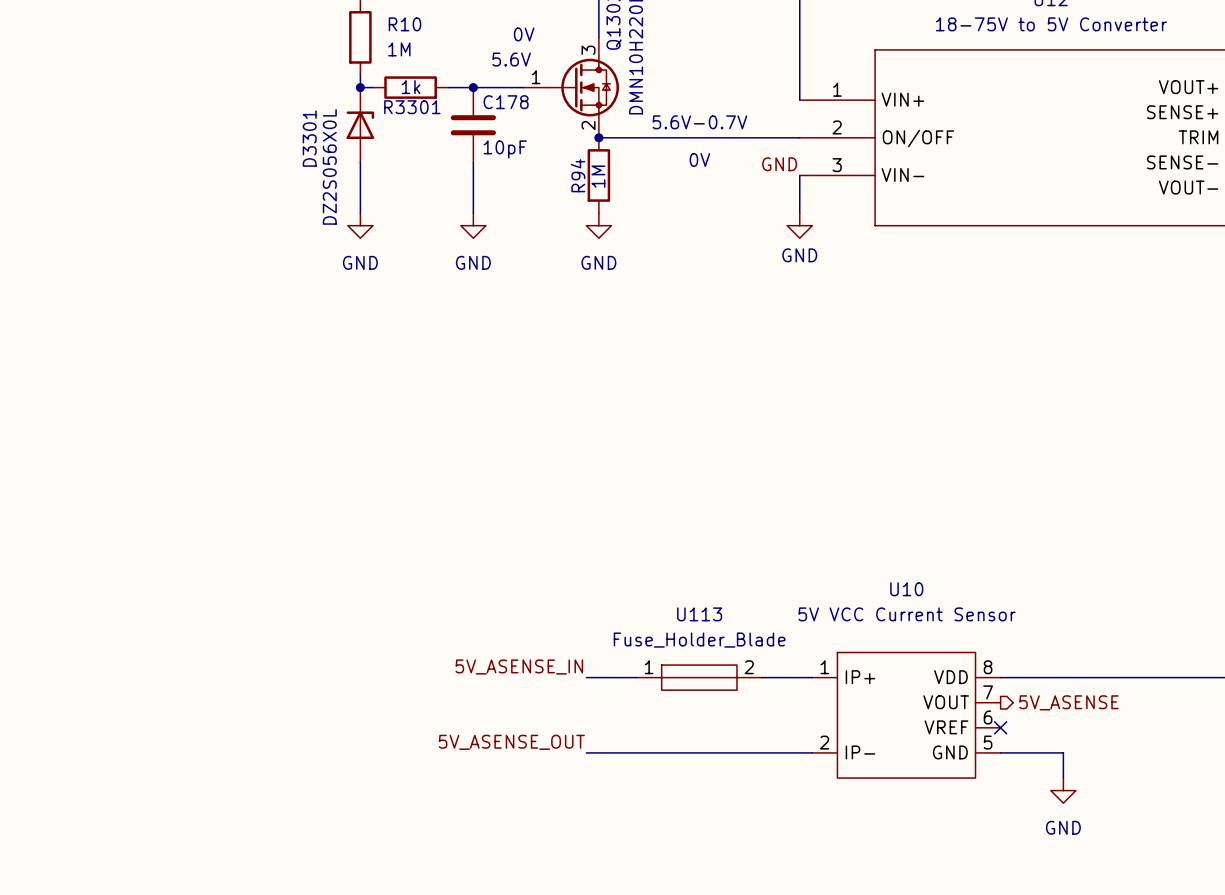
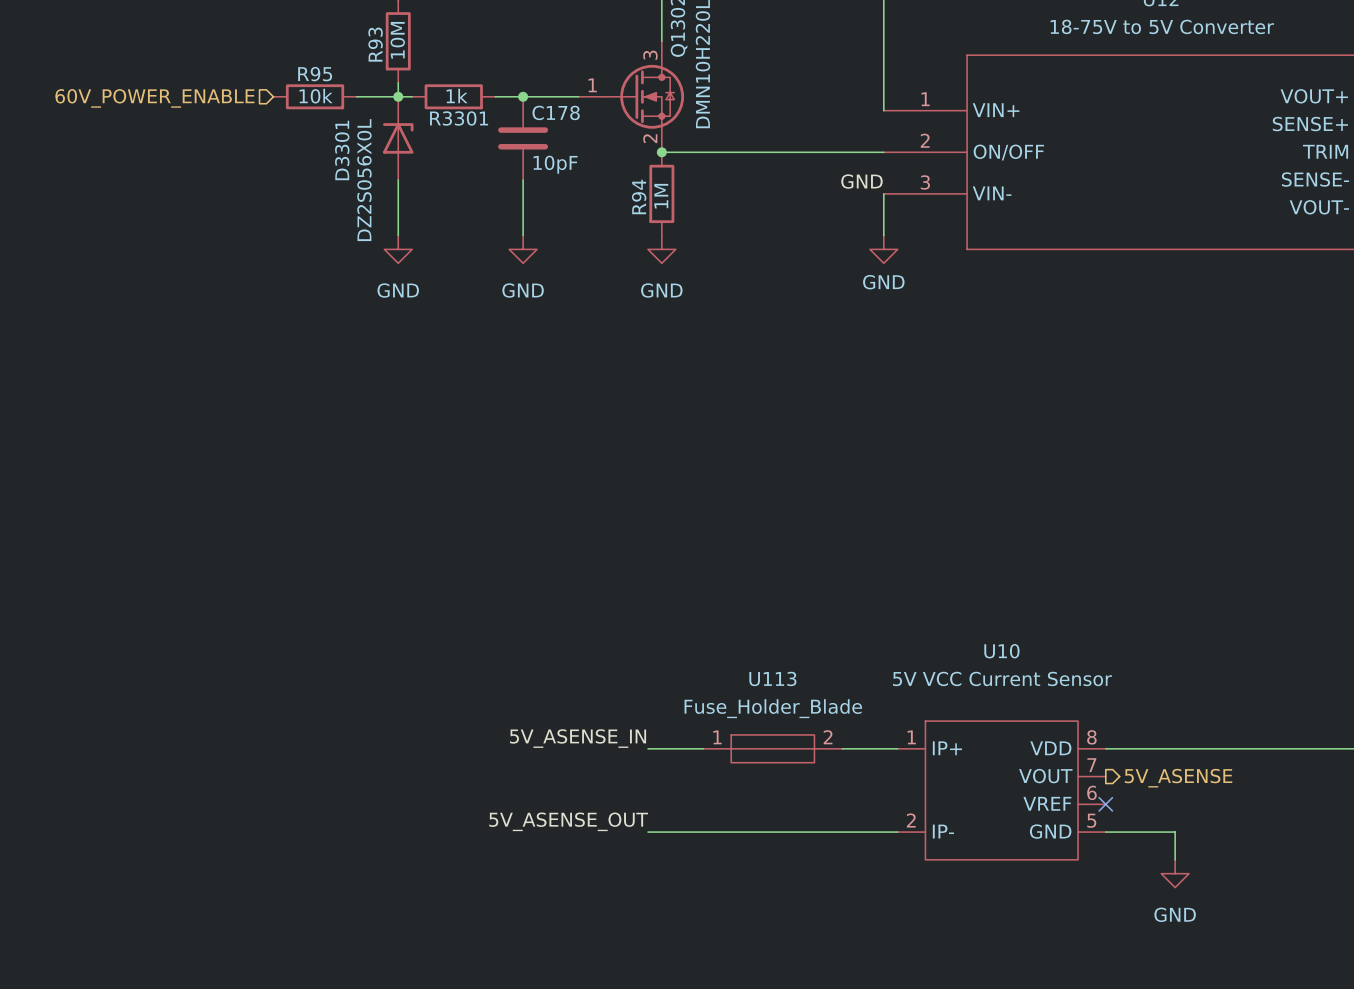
R10 name: R10 (405, 24) -> R93 (375, 44)
text: 0V (524, 34) -> none
R10 value: 1M (399, 49) -> 10M (397, 40)
text: 5.6V (511, 59) -> none
hierarchical label: none -> 60V_POWER_ENABLE (154, 98)
R95: none -> 10k (315, 96)
wire: none -> (356, 96) (398, 96)
text: 5.6V-0.7V (699, 122) -> none
text: 0V (699, 159) -> none

